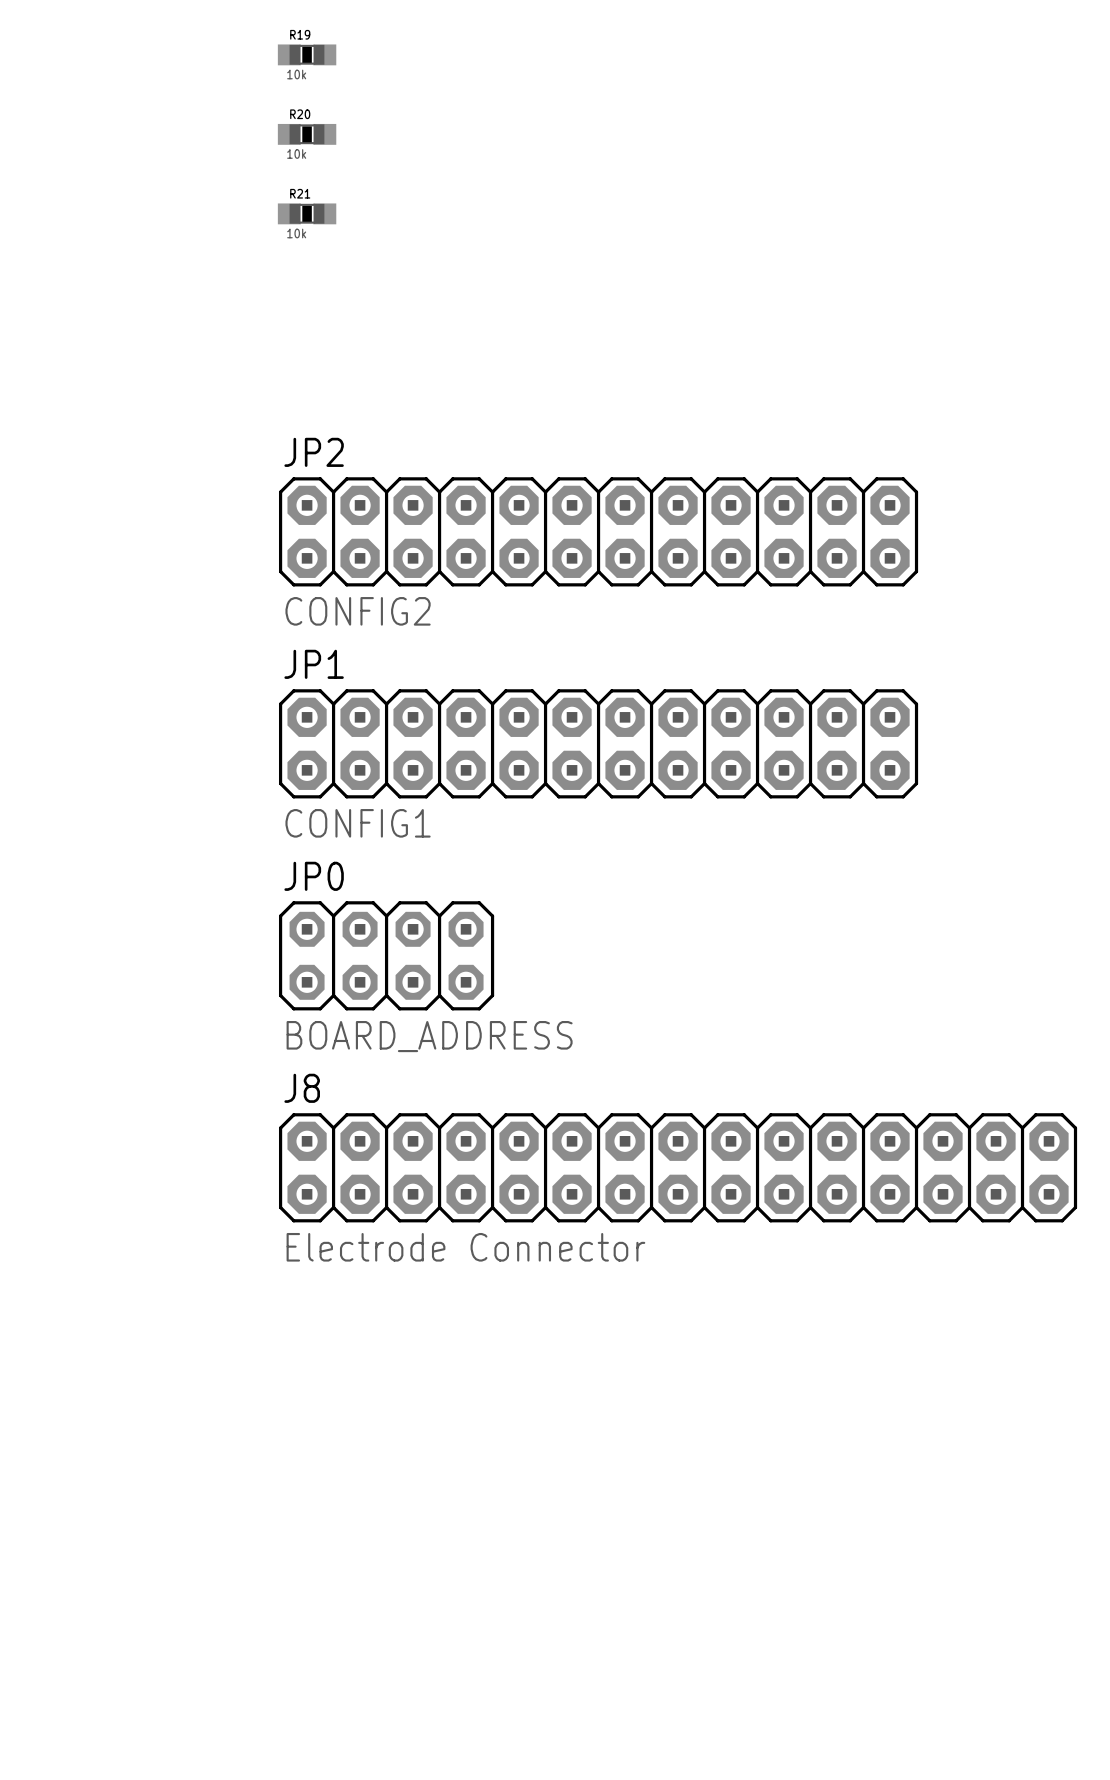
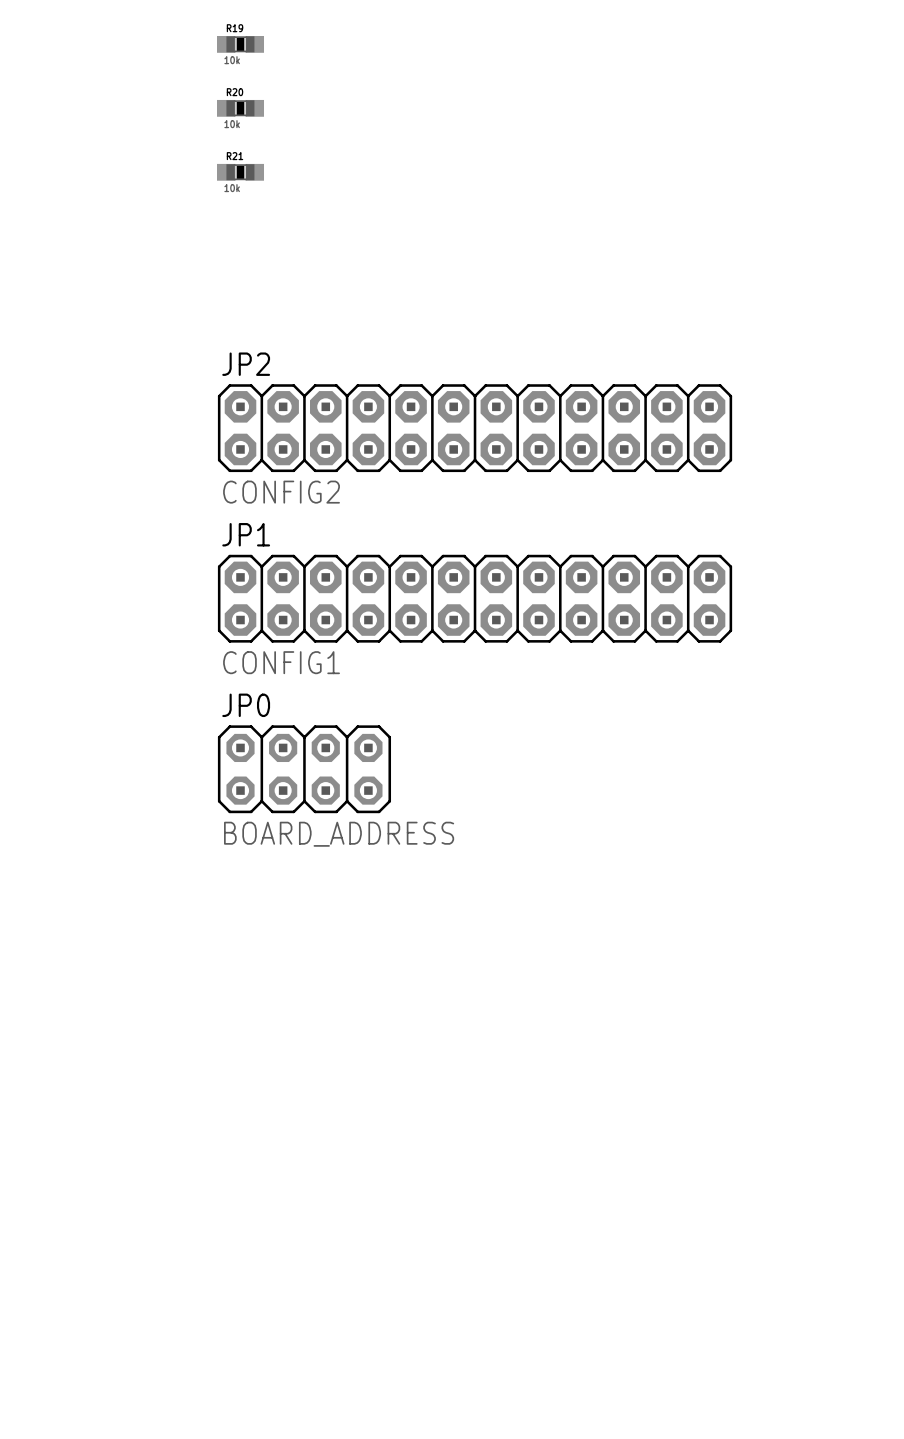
J8: Electrode Connector (678, 1167) -> none

